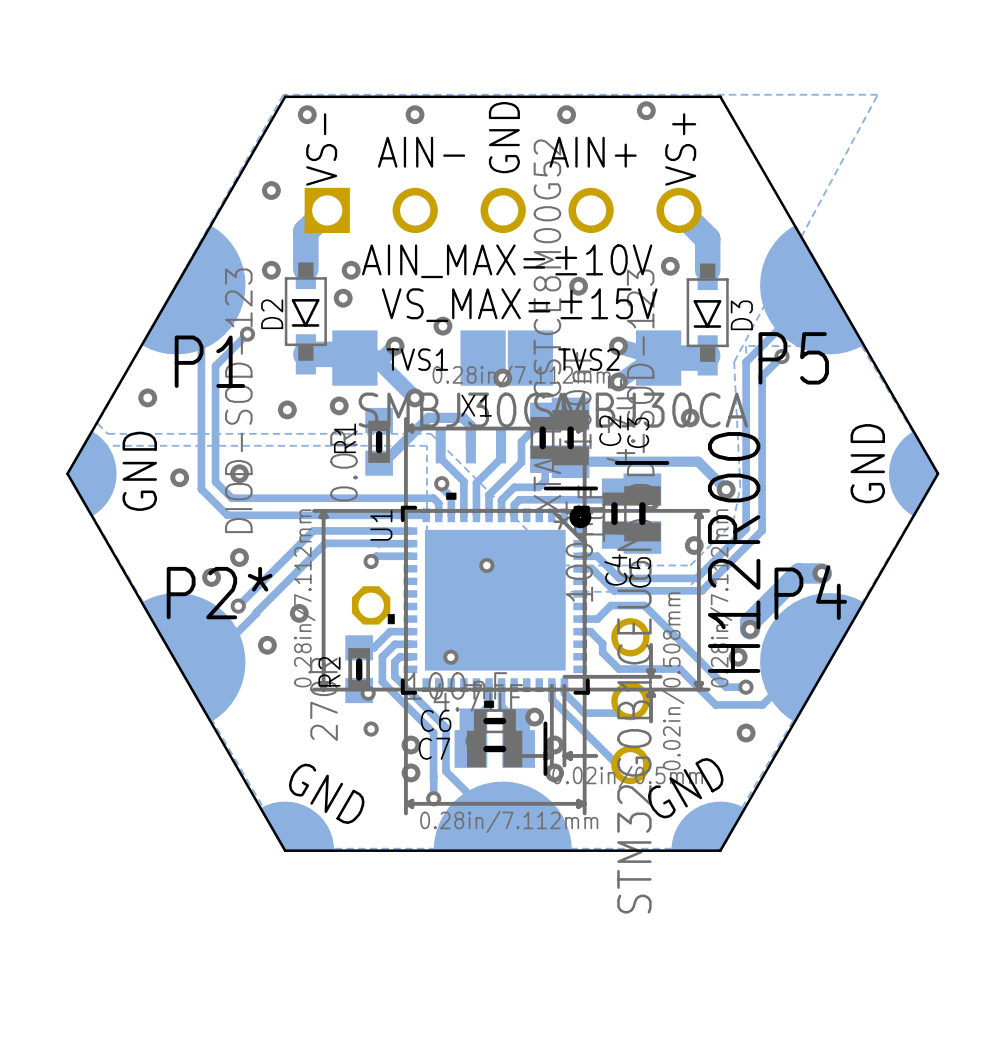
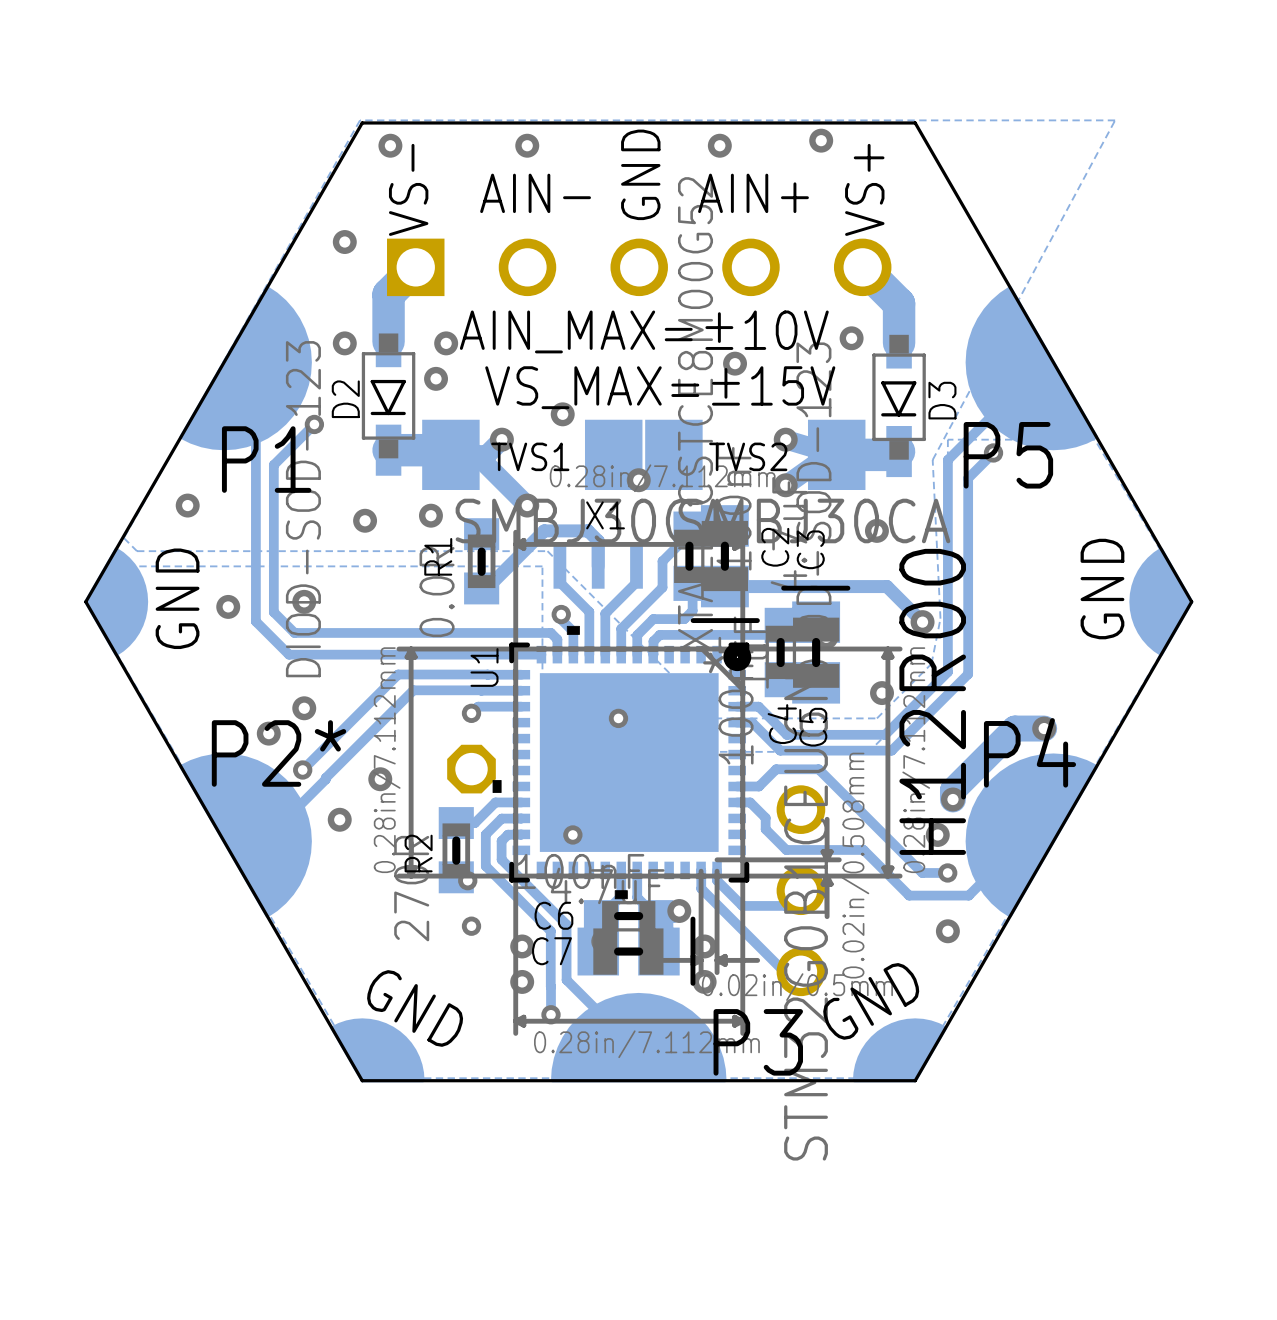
text: none -> P3 (758, 1042)

